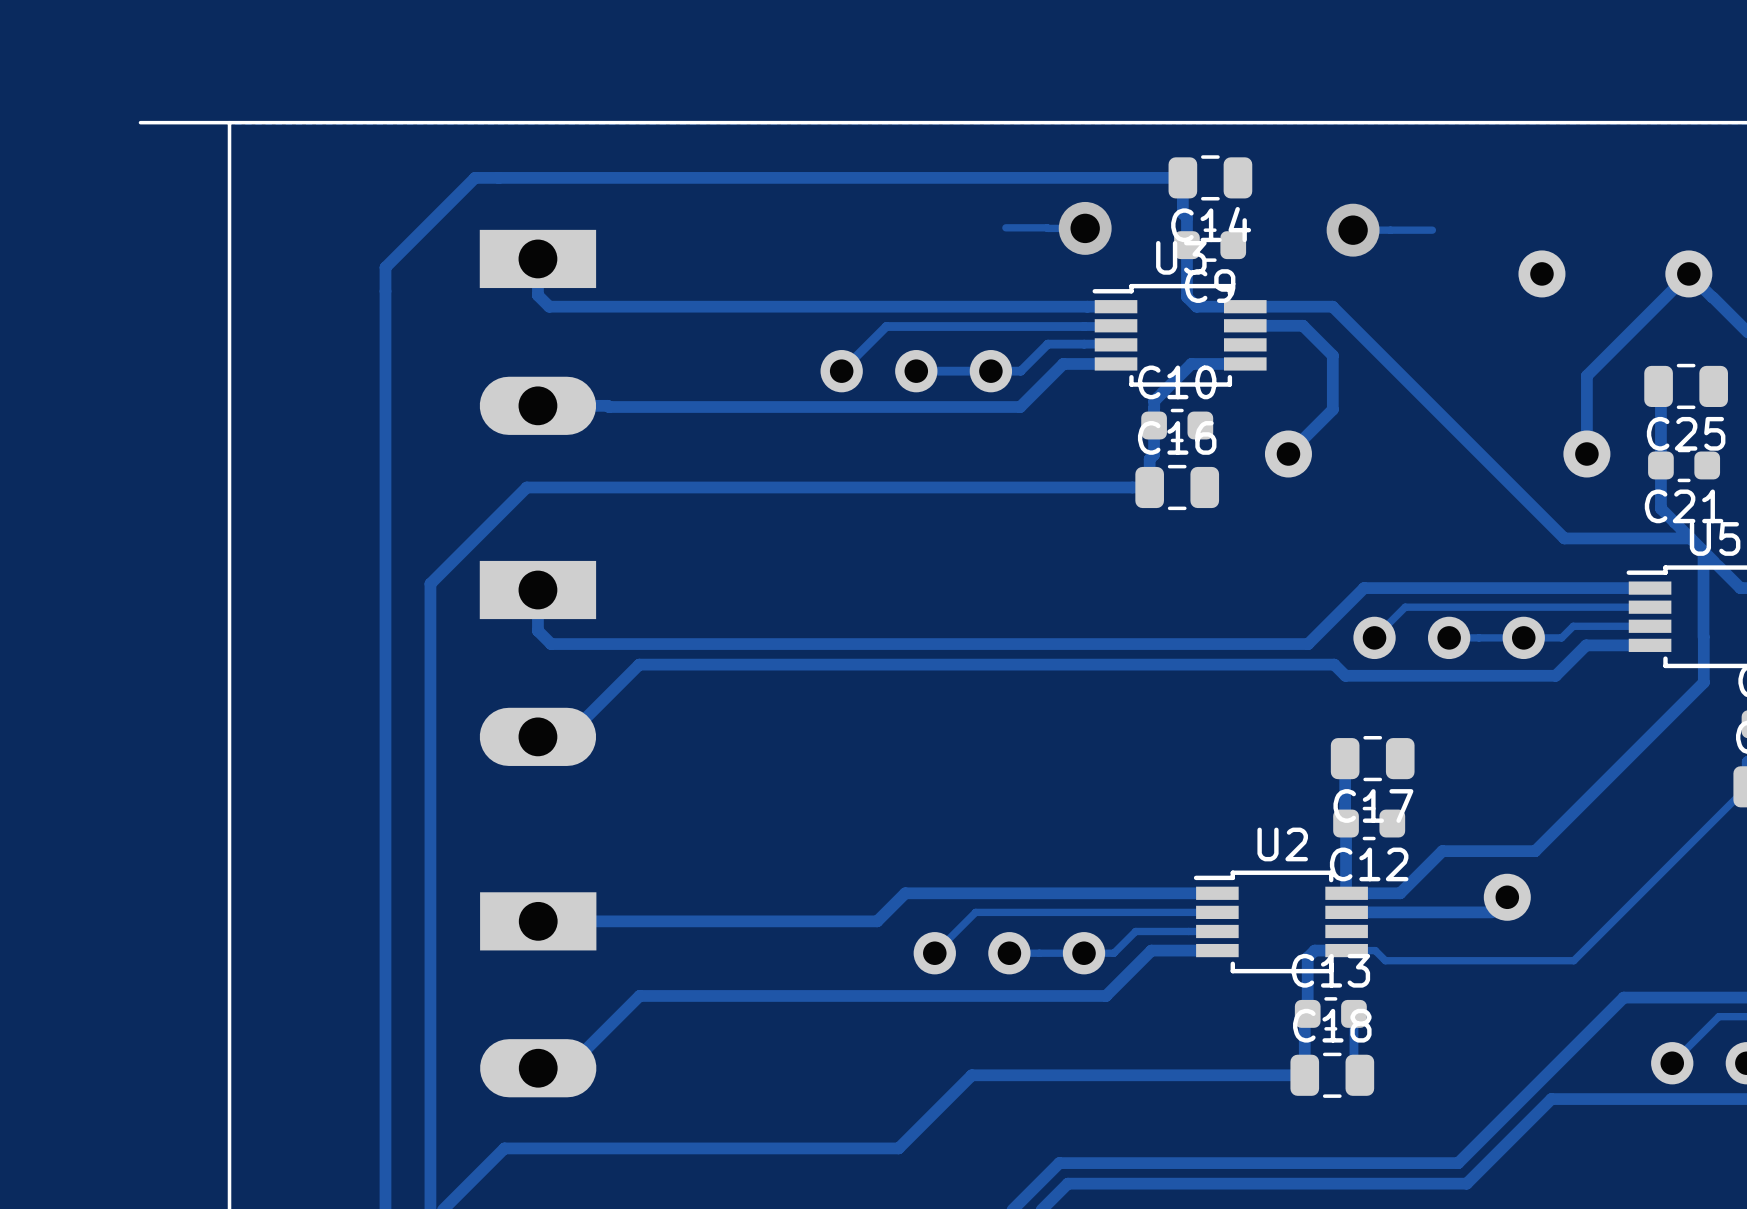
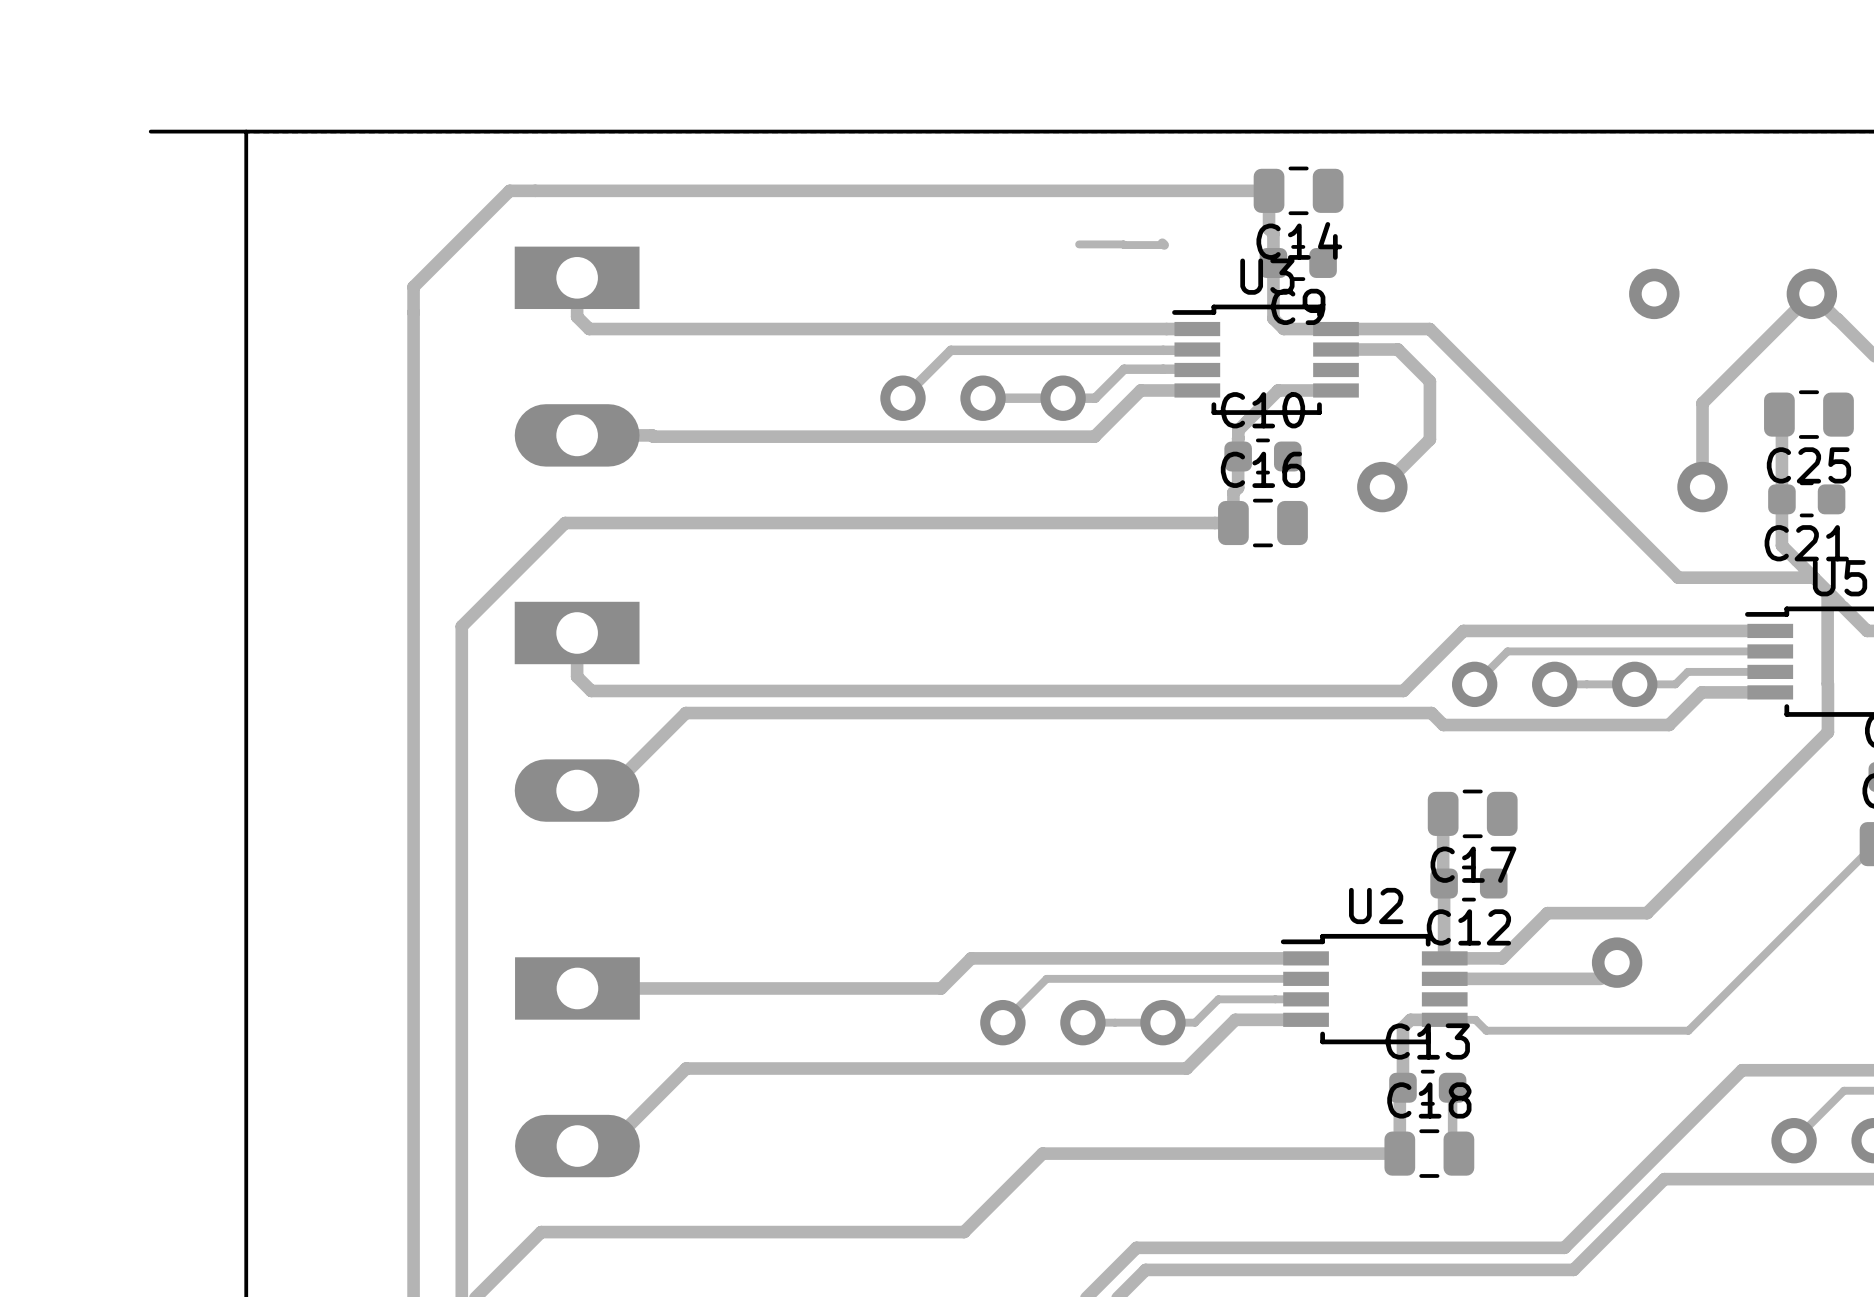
via: (1085, 228) -> none
track: (1353, 230) (1432, 230) -> none
via: (1353, 230) -> none

